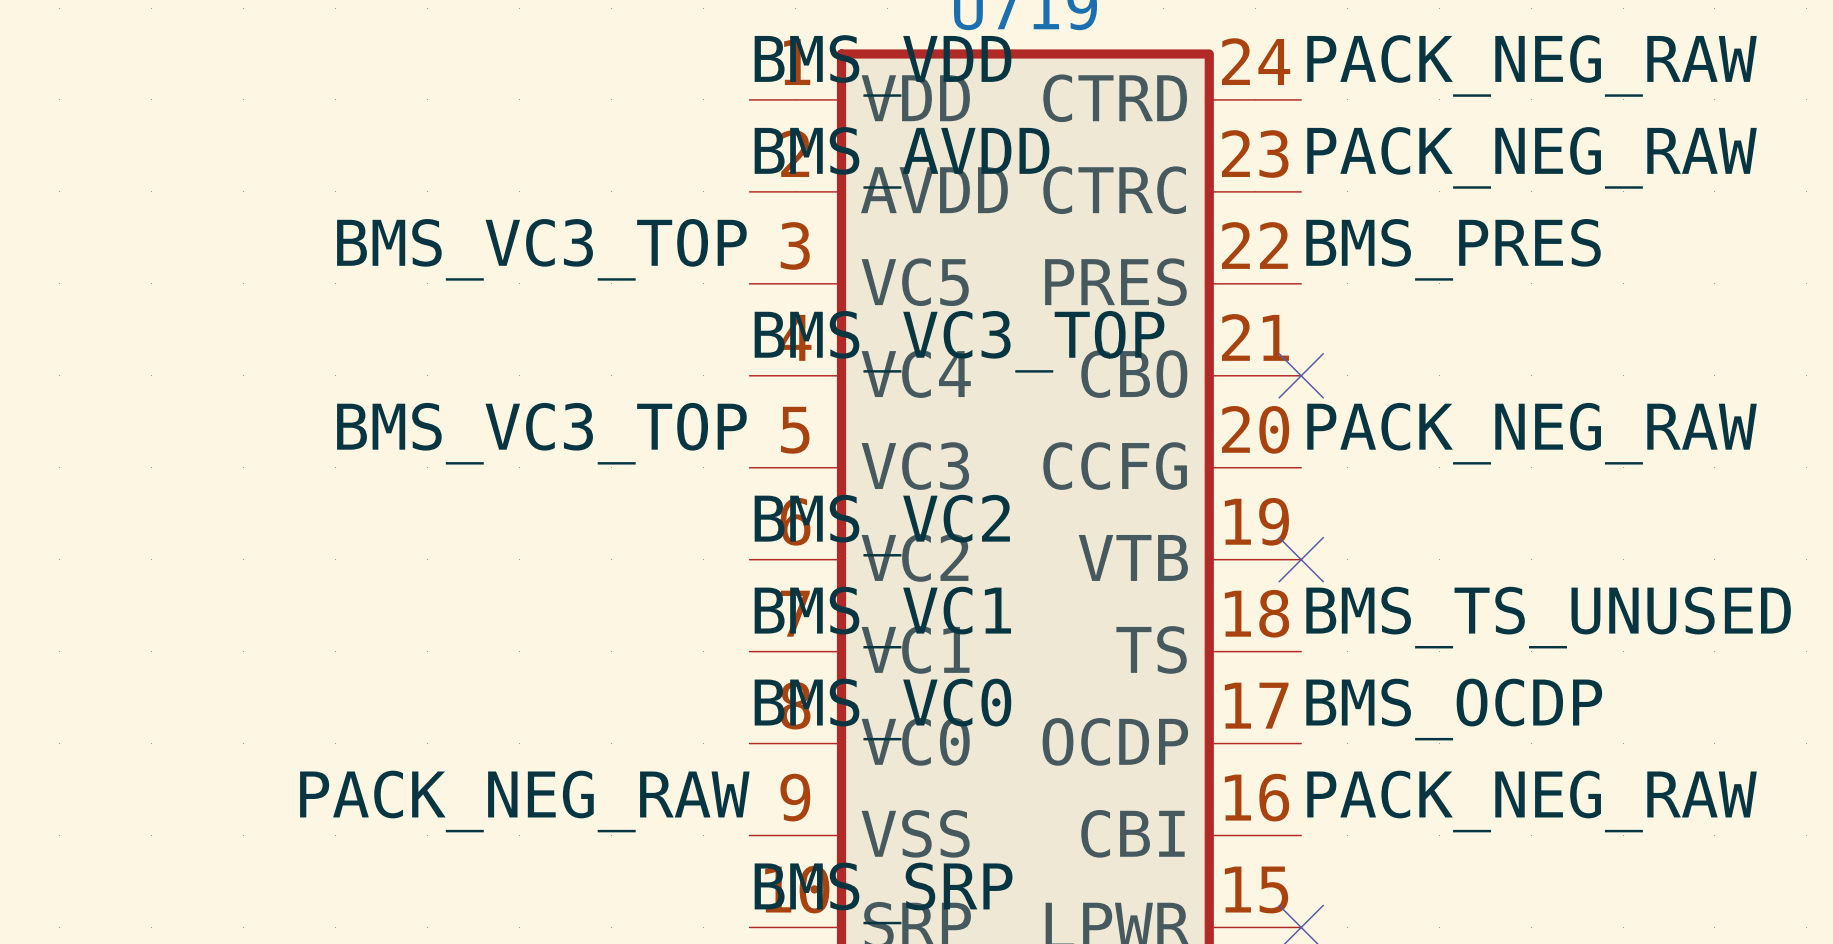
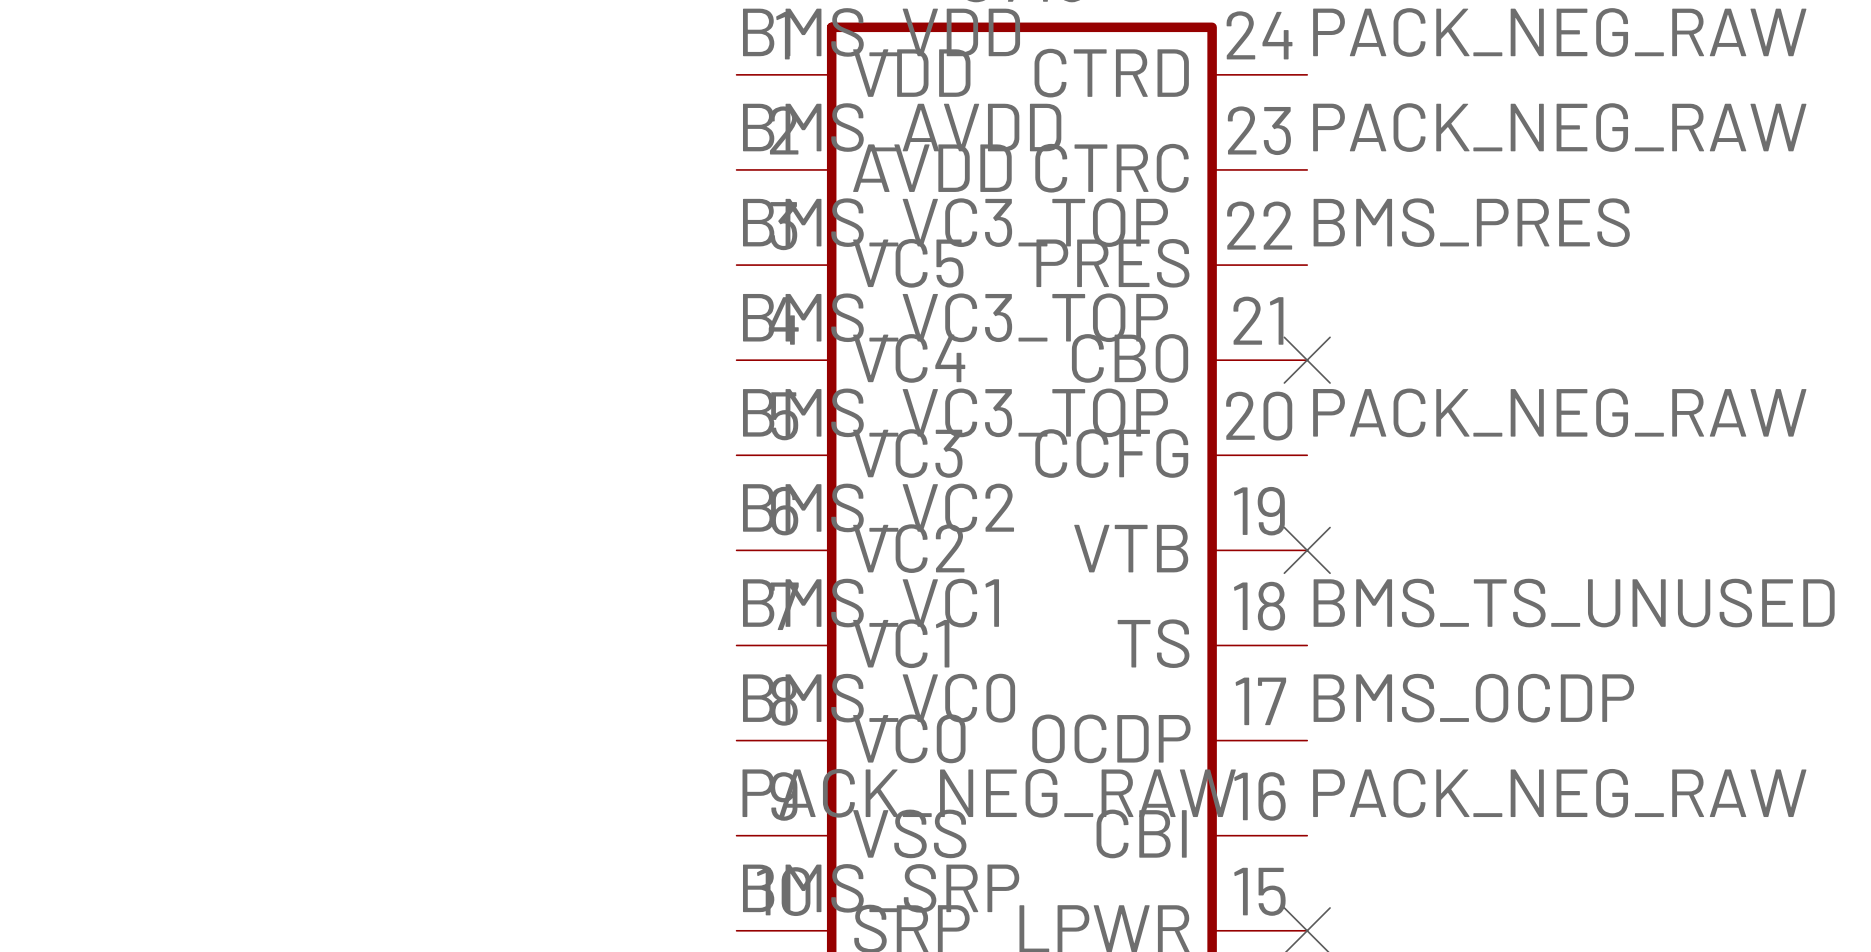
label position: BMS_VC3_TOP (541, 249) -> BMS_VC3_TOP (955, 222)
label position: BMS_VC3_TOP (541, 433) -> BMS_VC3_TOP (955, 412)
label position: PACK_NEG_RAW (524, 801) -> PACK_NEG_RAW (989, 793)

